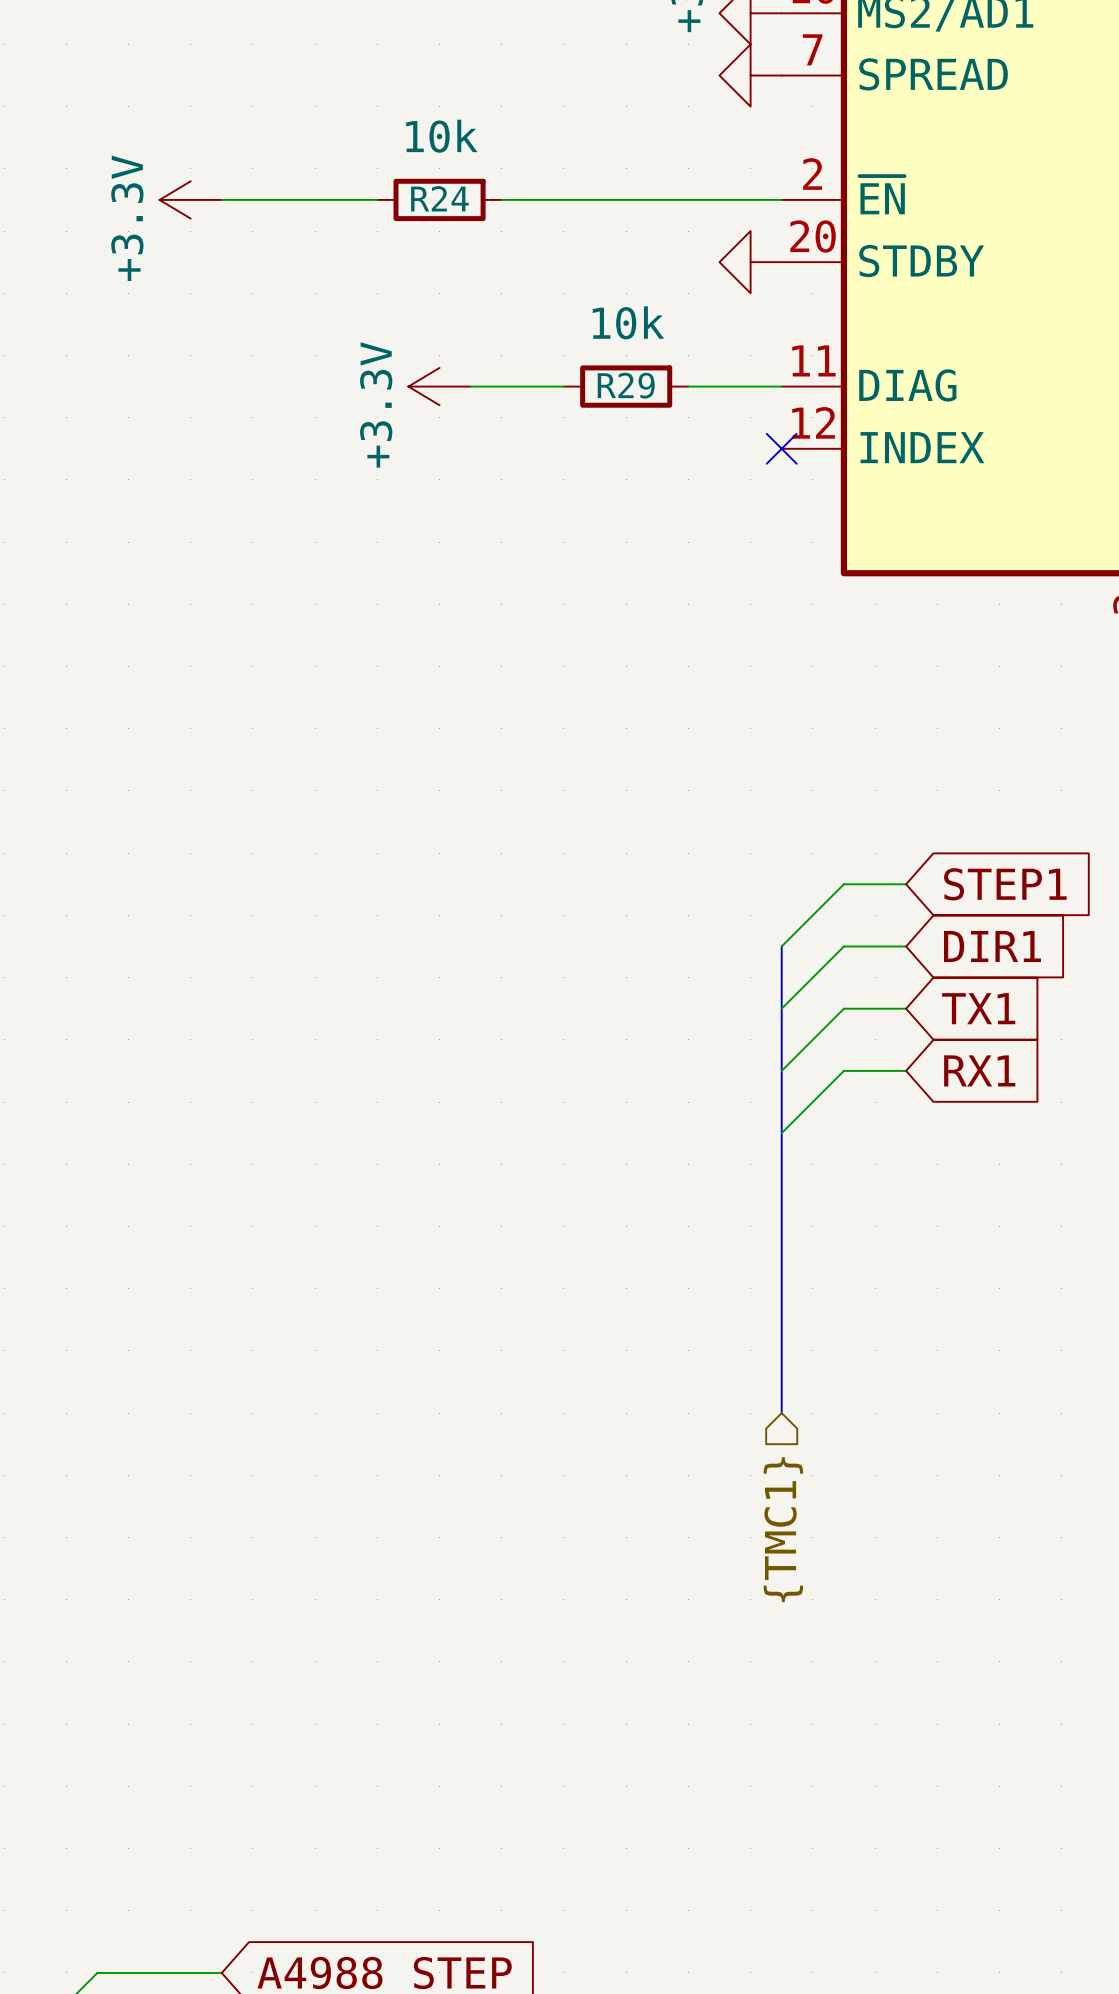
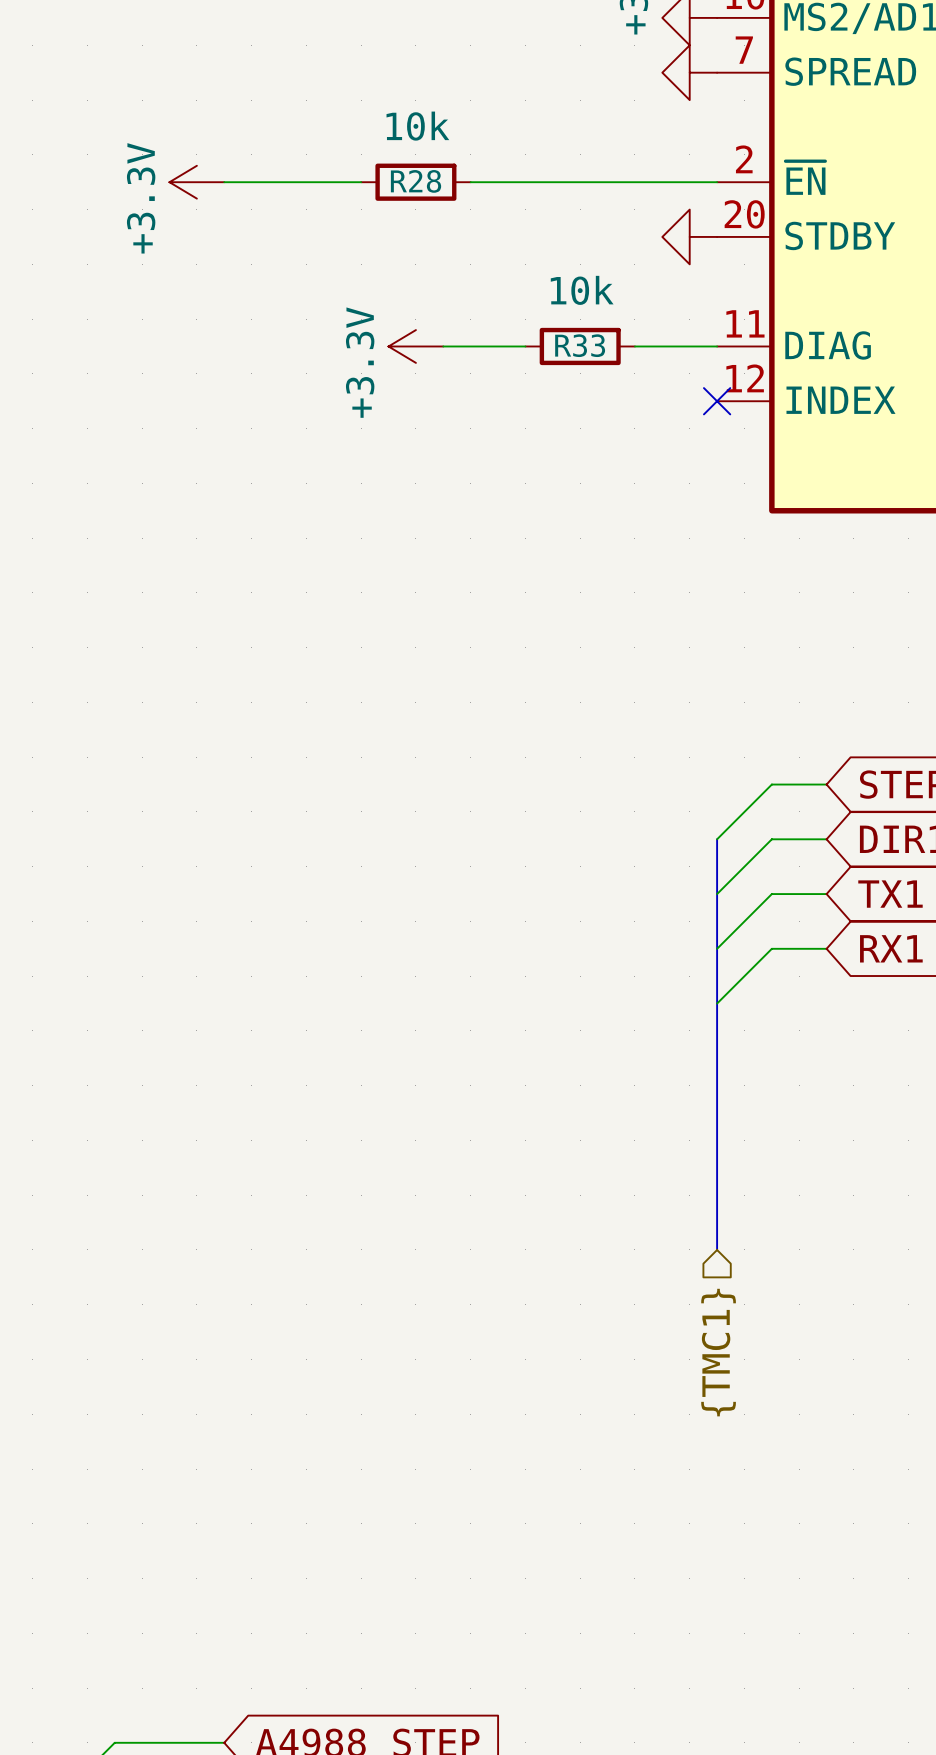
R24 name: R24 (439, 198) -> R28 (416, 181)
R29 name: R29 (626, 385) -> R33 (580, 345)

